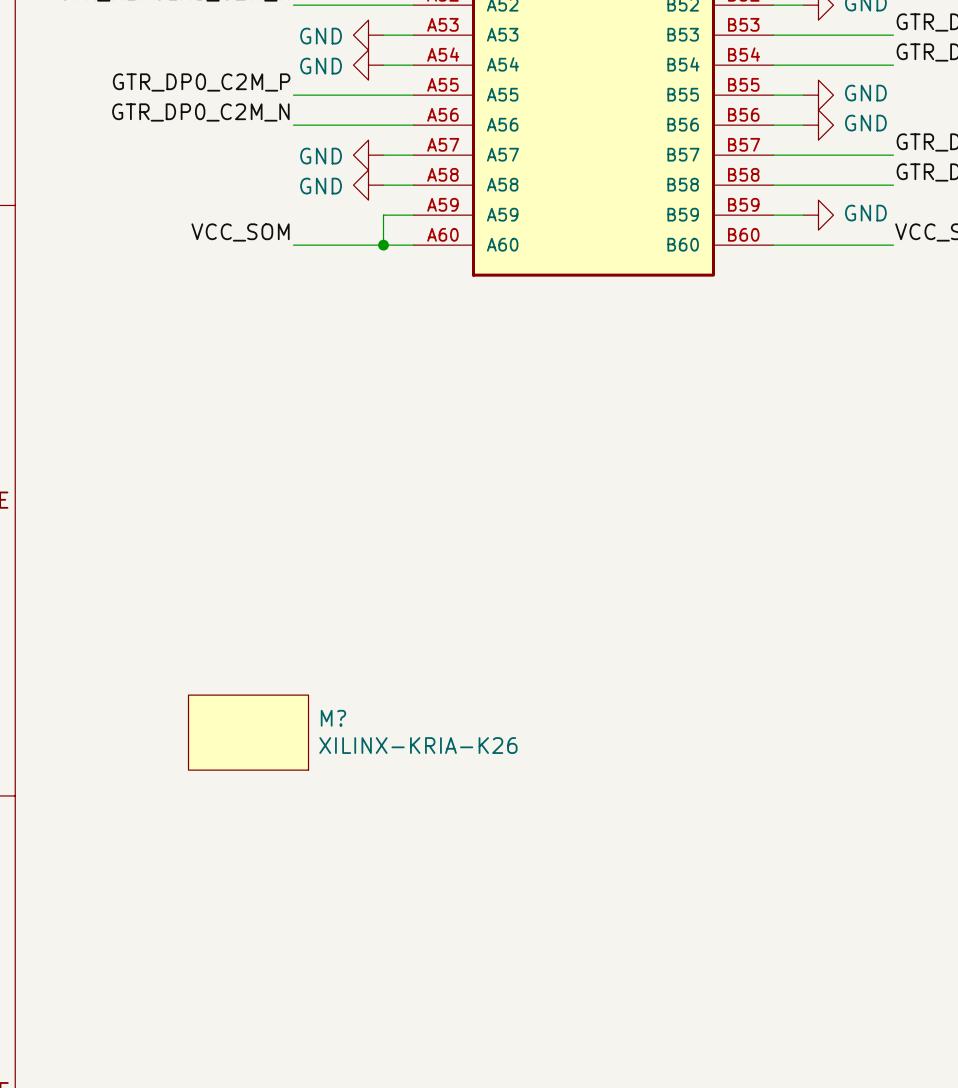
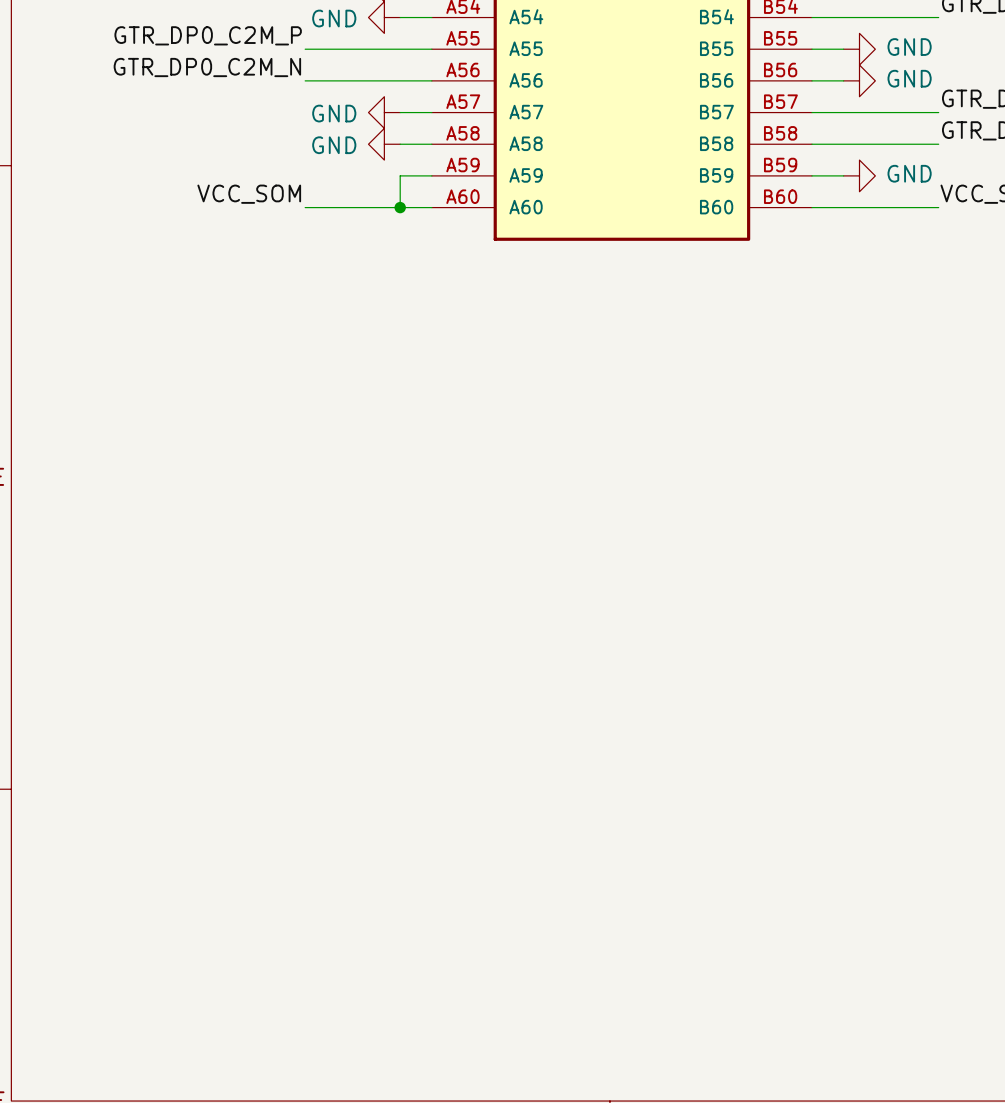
M?: XILINX-KRIA-K26 (248, 732) -> none

